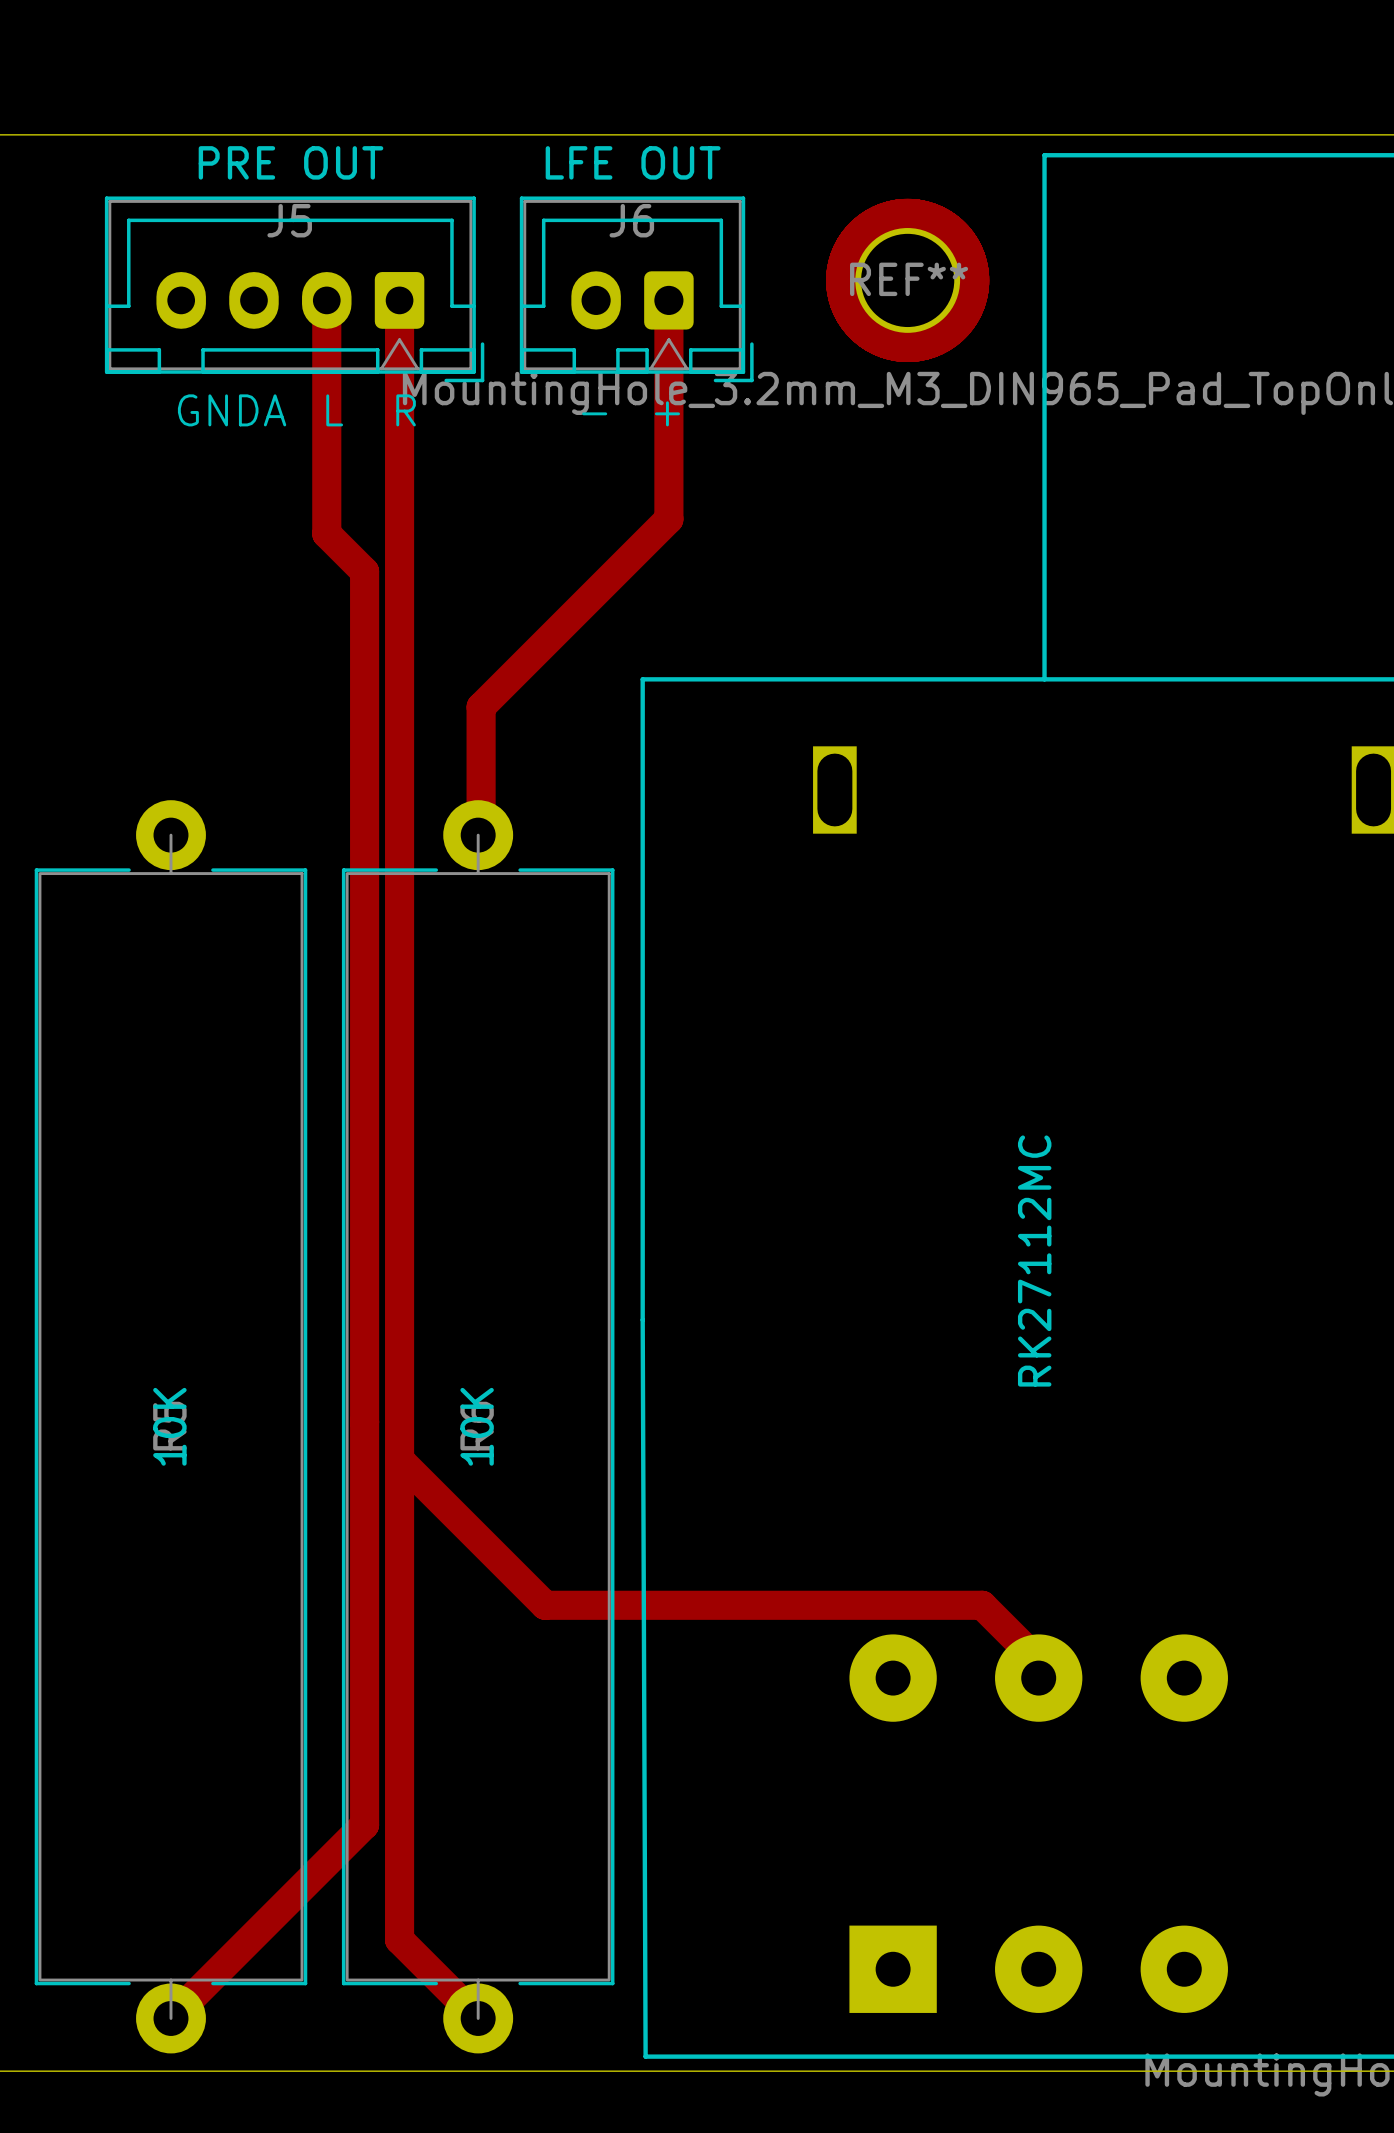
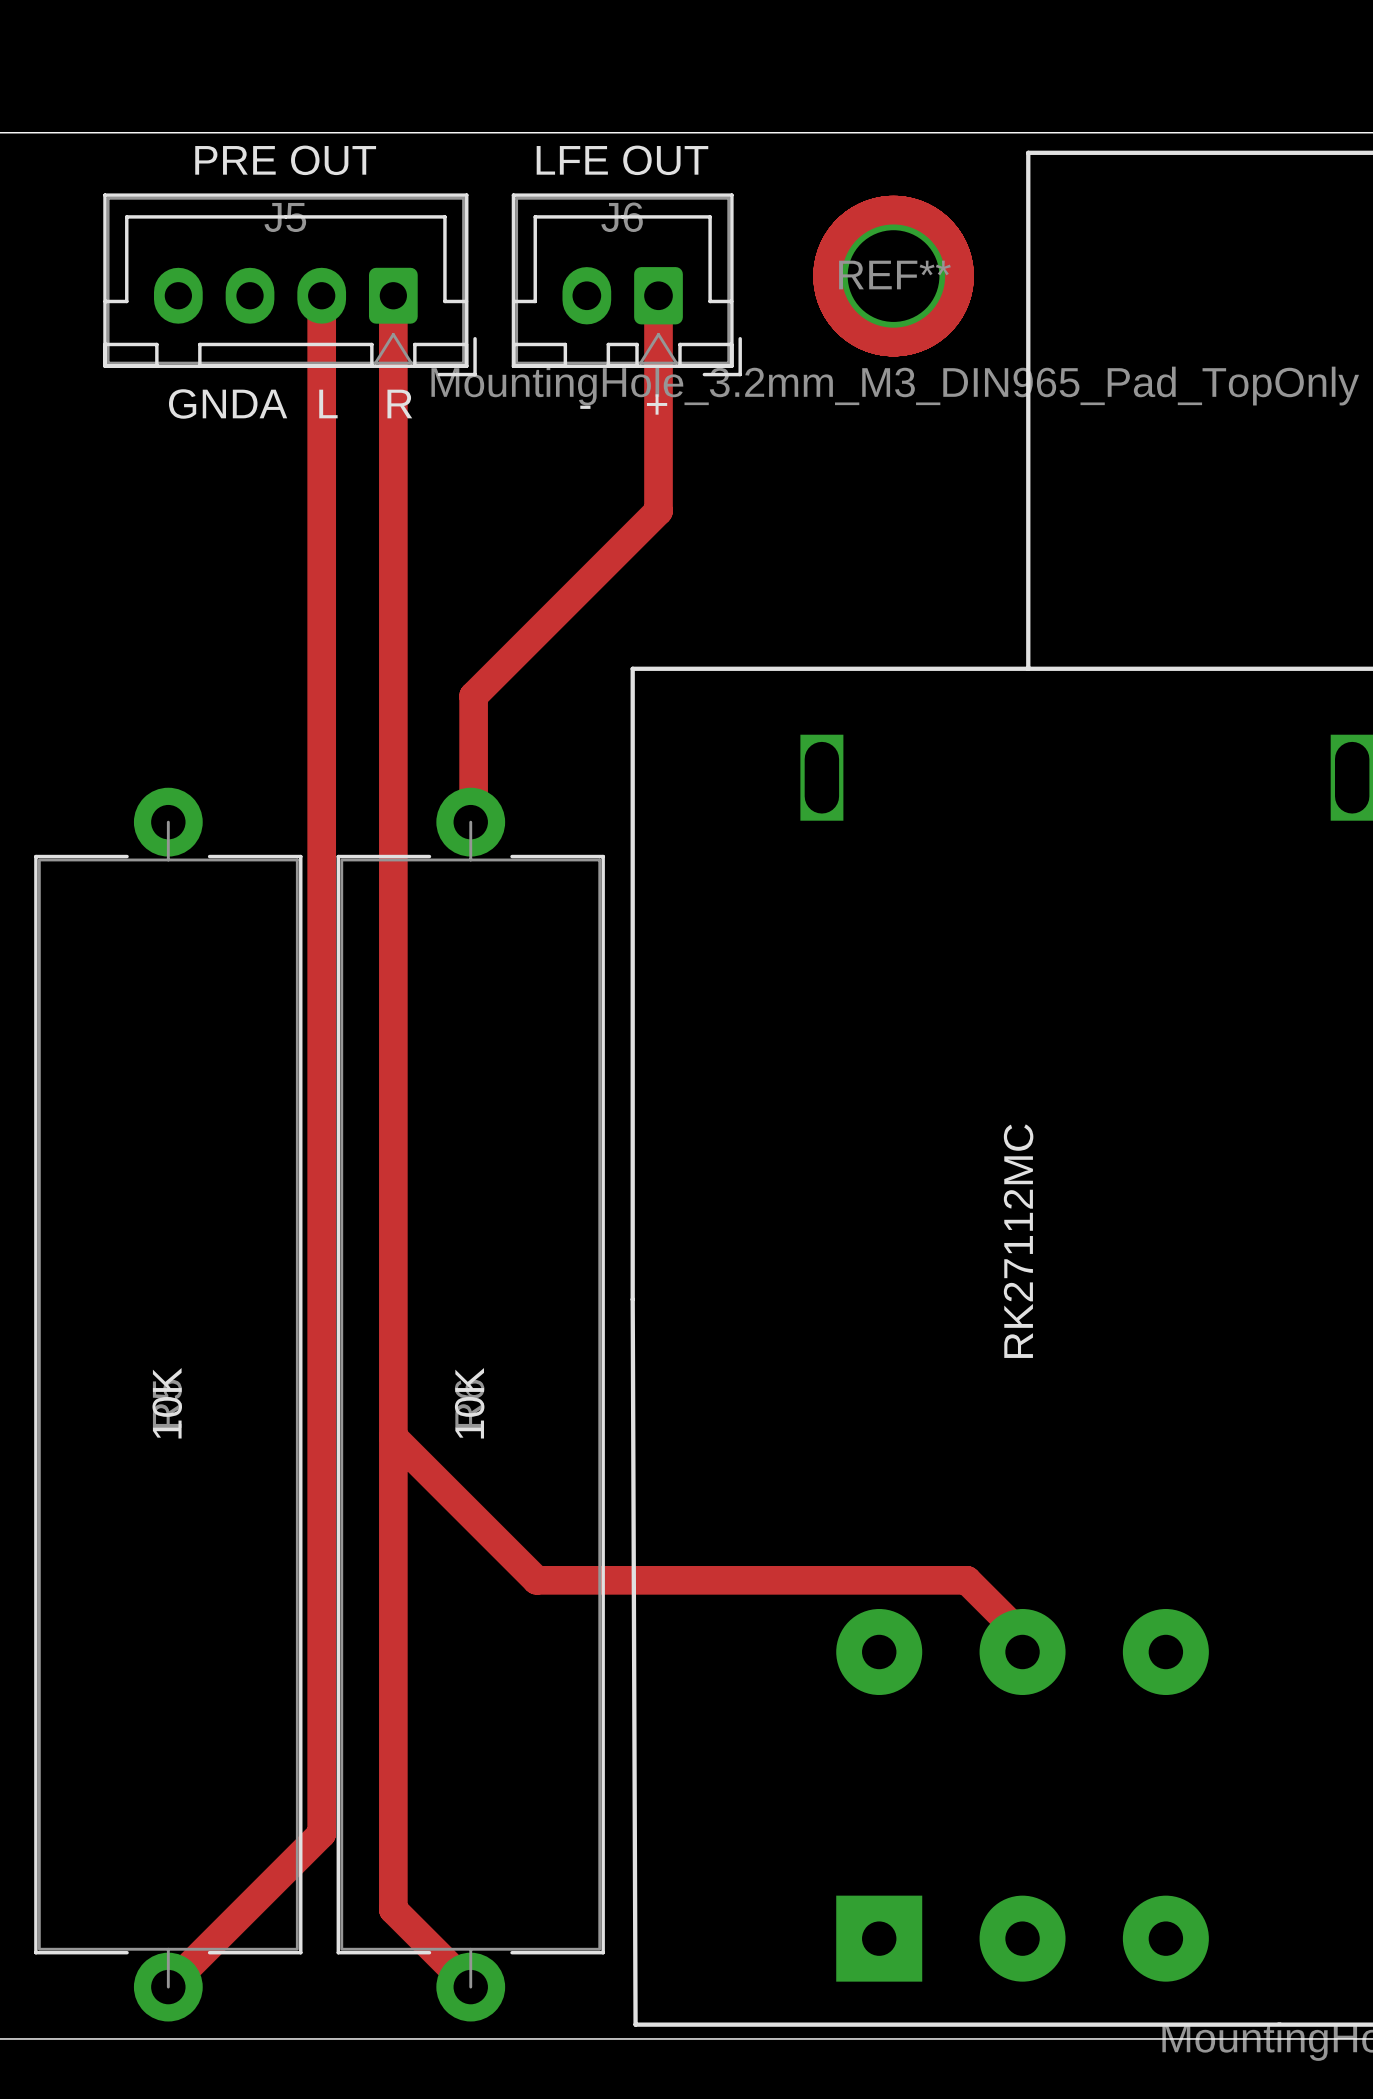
track: (326, 533) (364, 571) (364, 1824) (326, 1862) -> (321, 525) (321, 1833)

